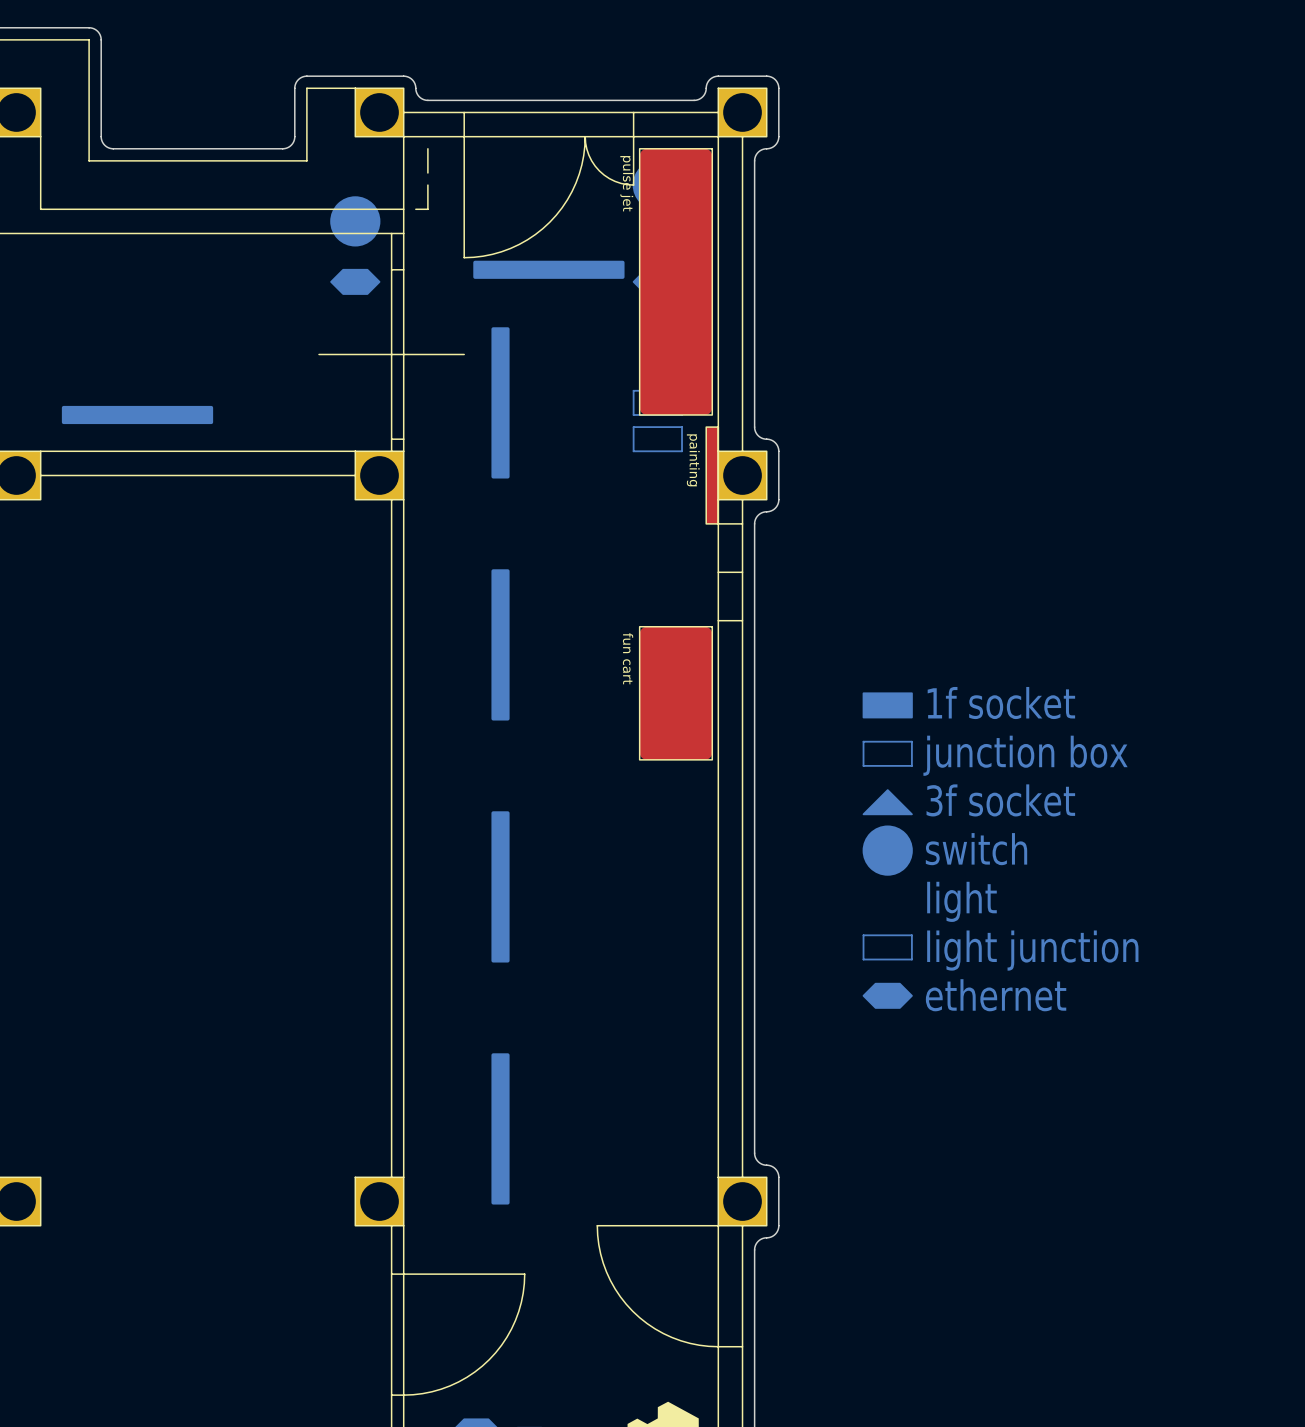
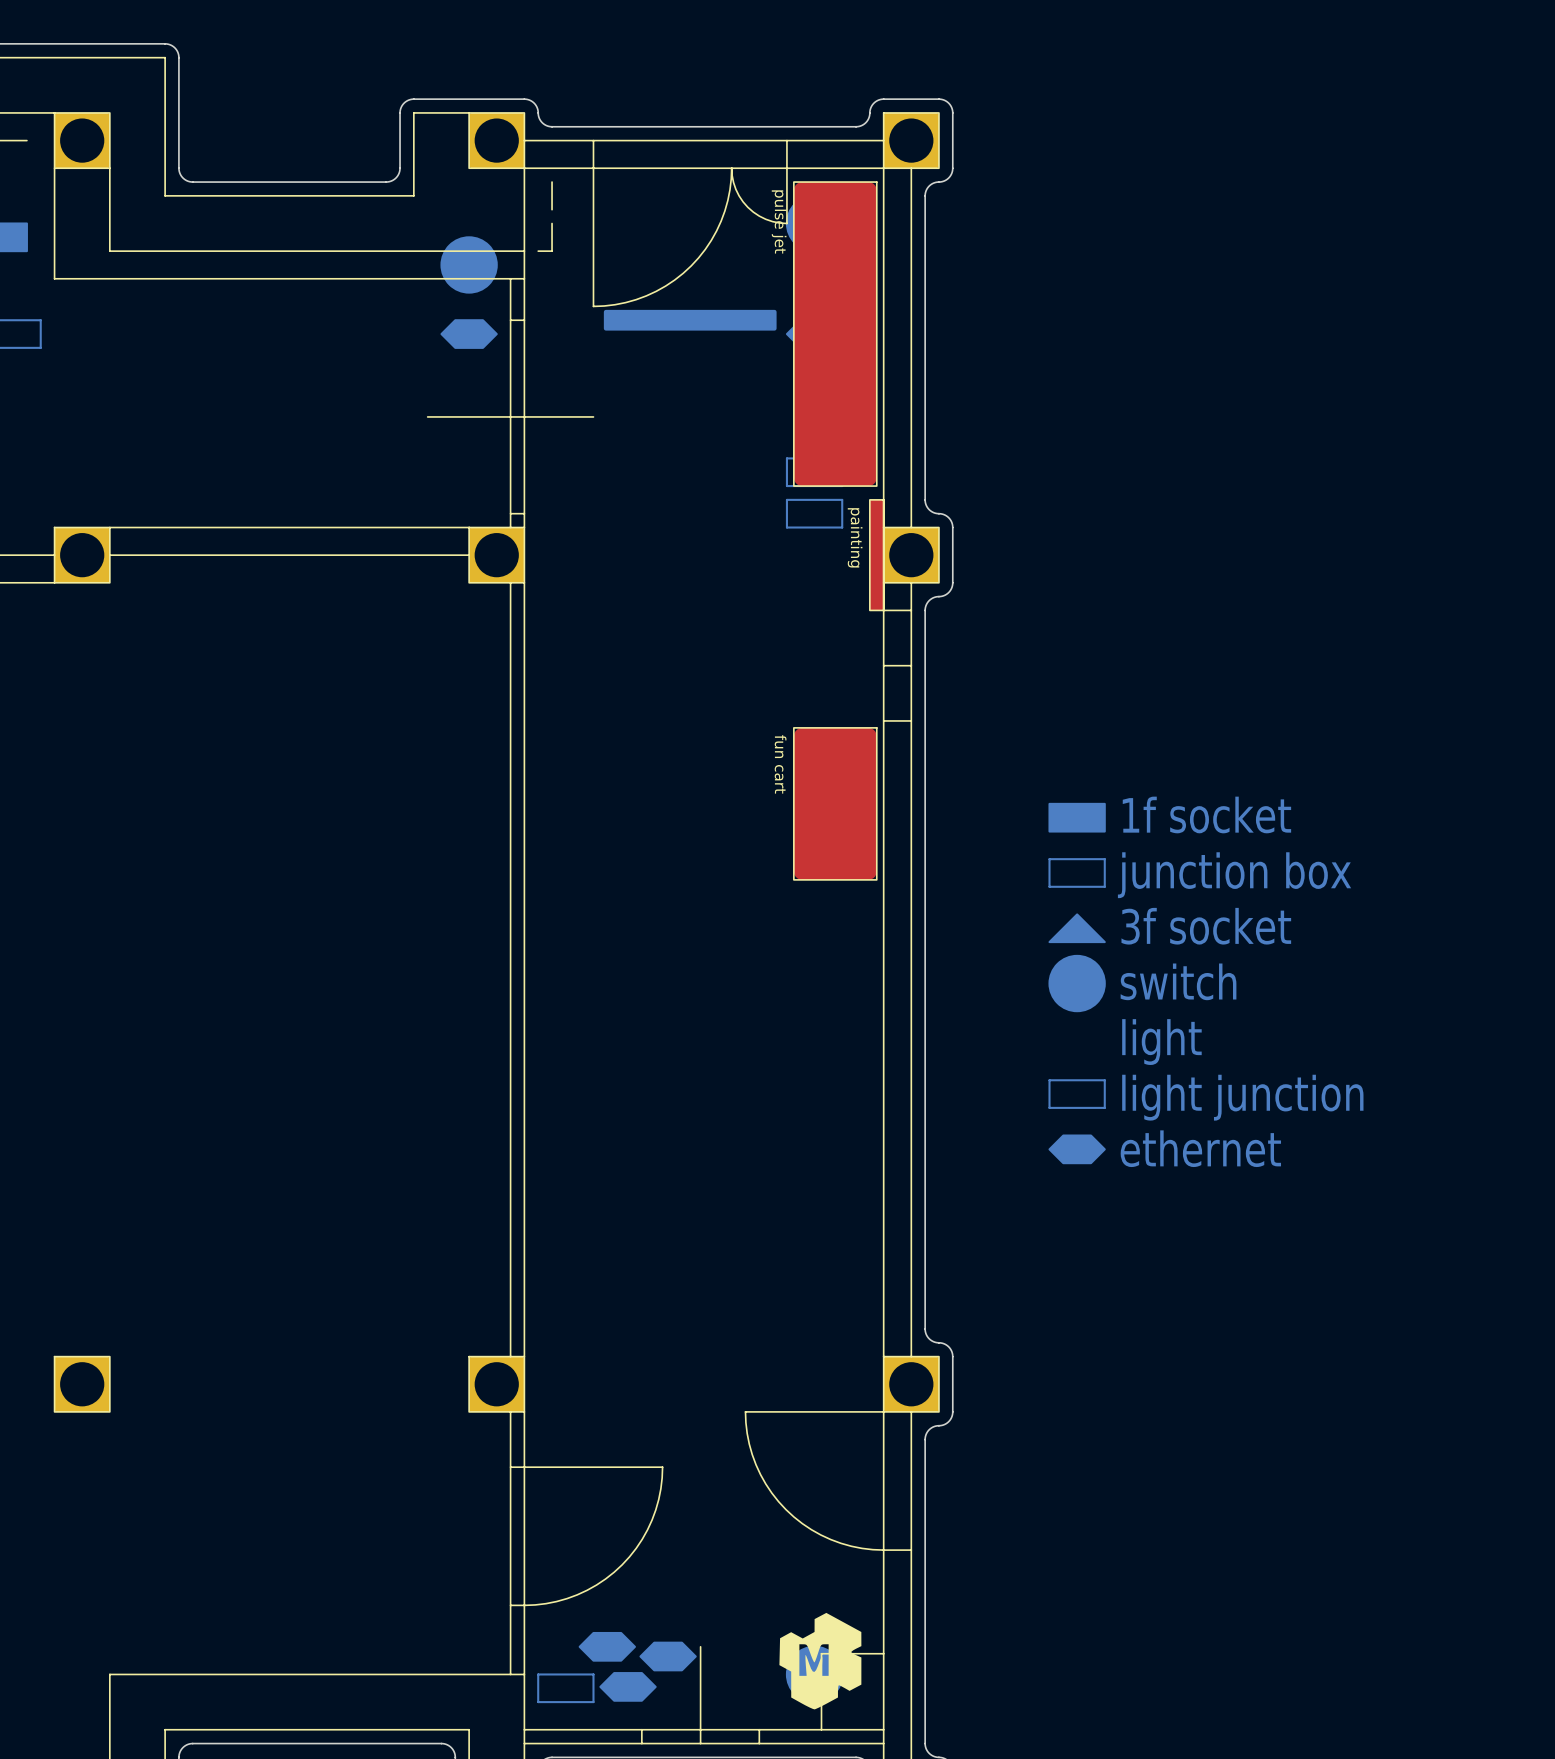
part: (500, 402) -> none
part: (137, 414) -> none
part: (500, 644) -> none
part: (500, 886) -> none
part: (500, 1128) -> none

